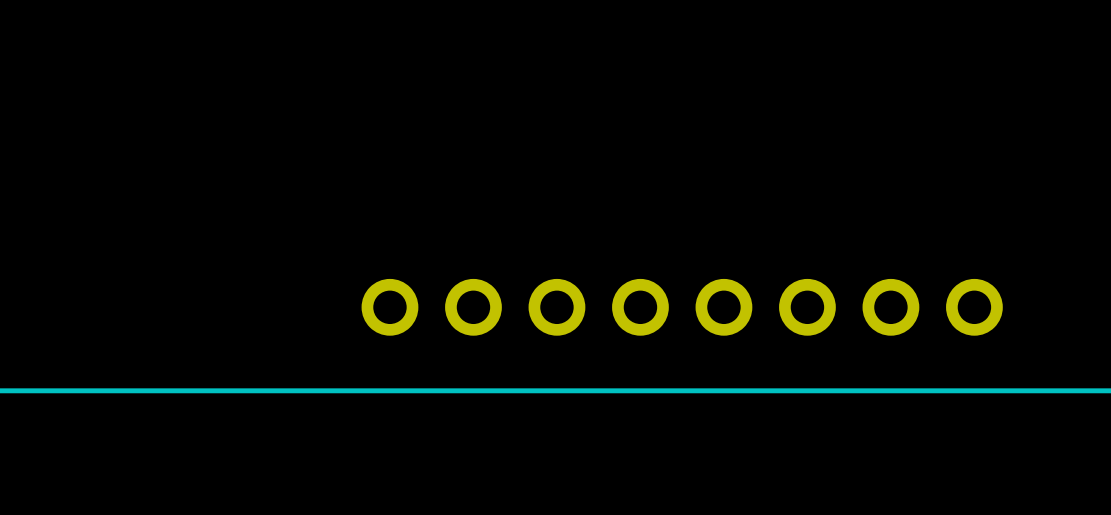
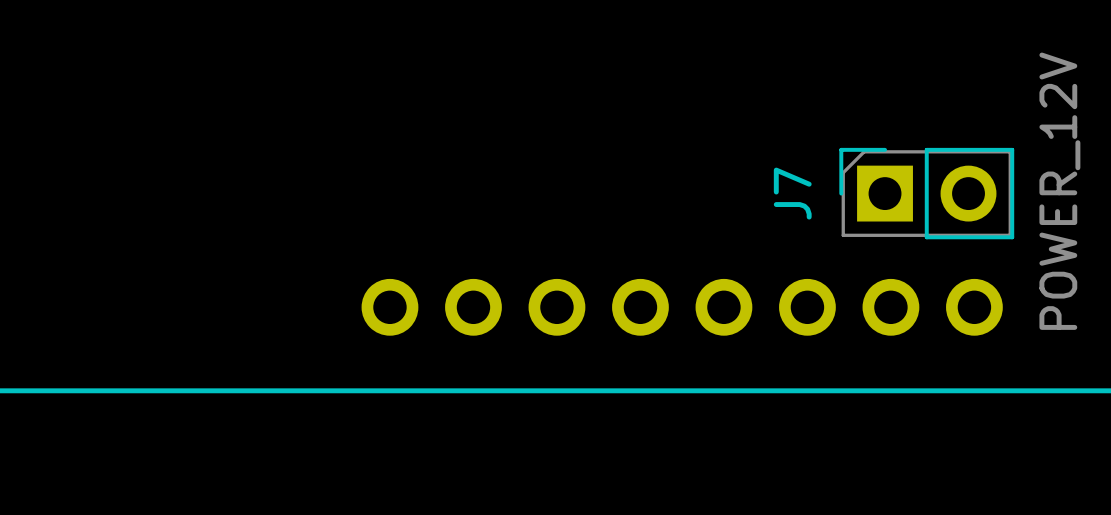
J7: none -> POWER_12V (926, 193)

